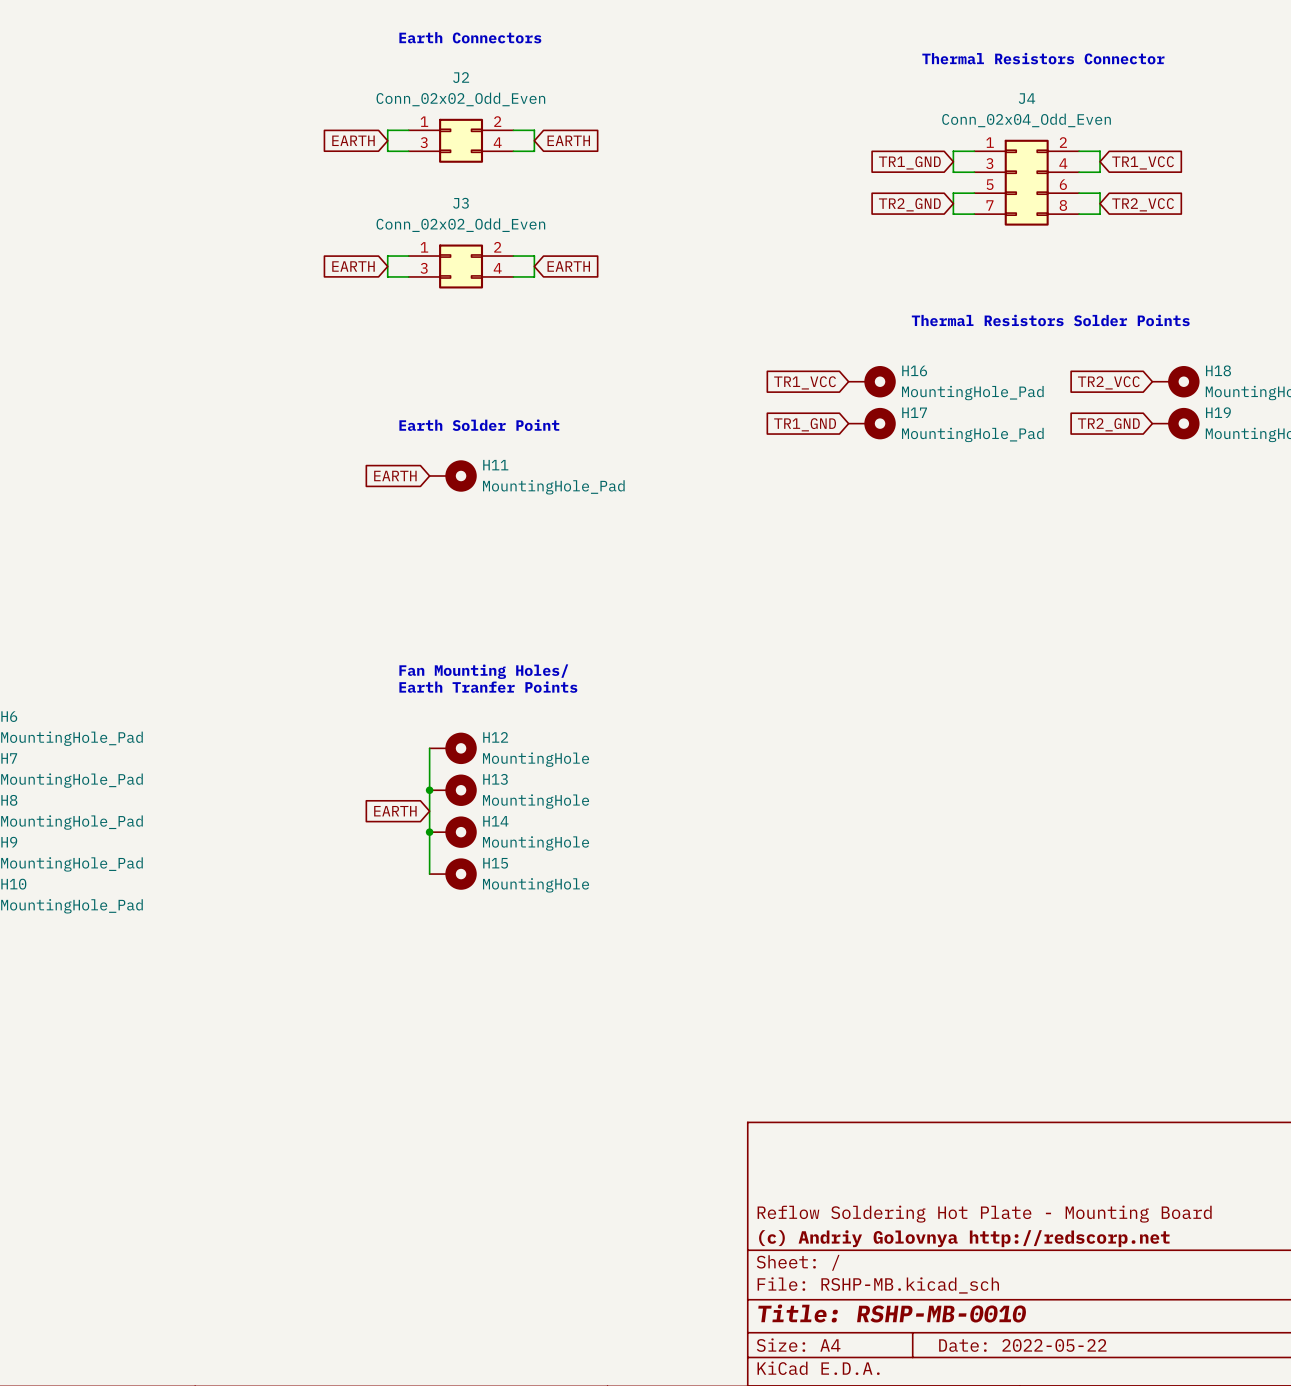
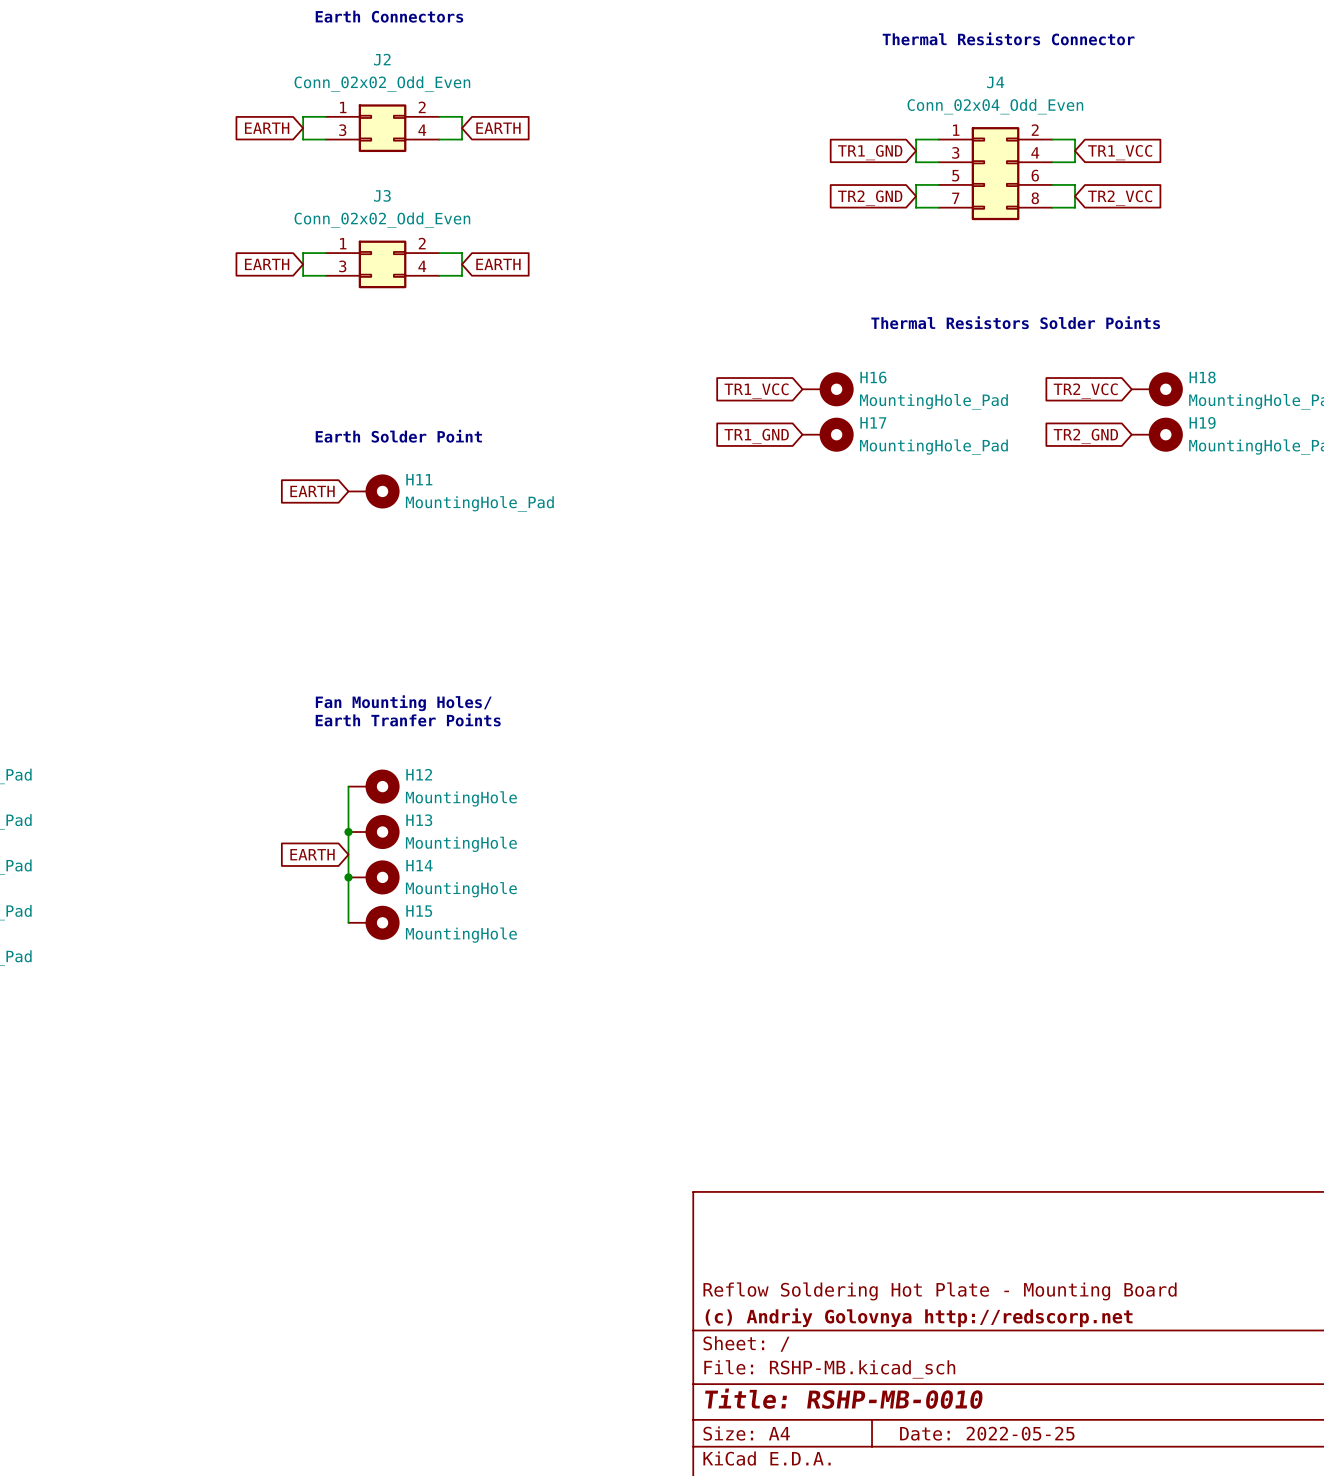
title block: Date: 2022-05-22 (1022, 1345) -> Date: 2022-05-25 (987, 1433)

